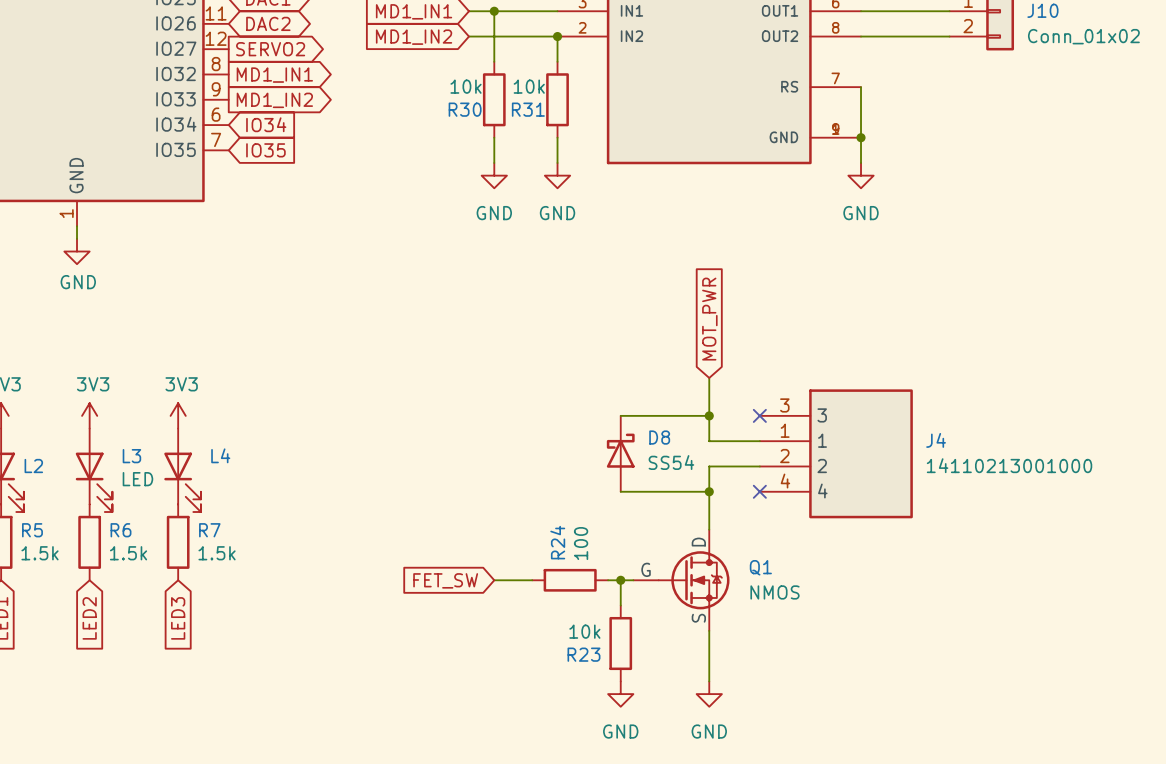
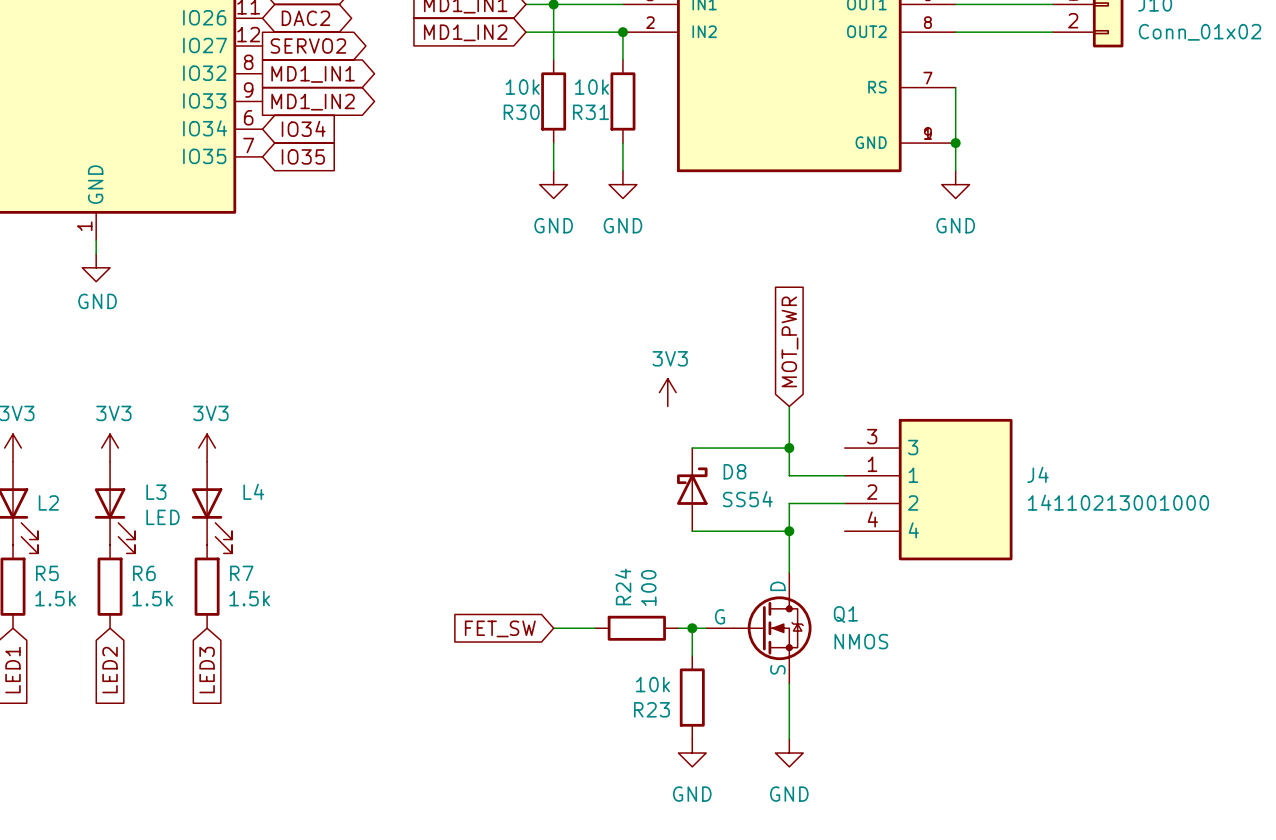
power symbol: none -> 3V3 (667, 392)
no-connect mark: (759, 415) -> none
no-connect mark: (759, 491) -> none

